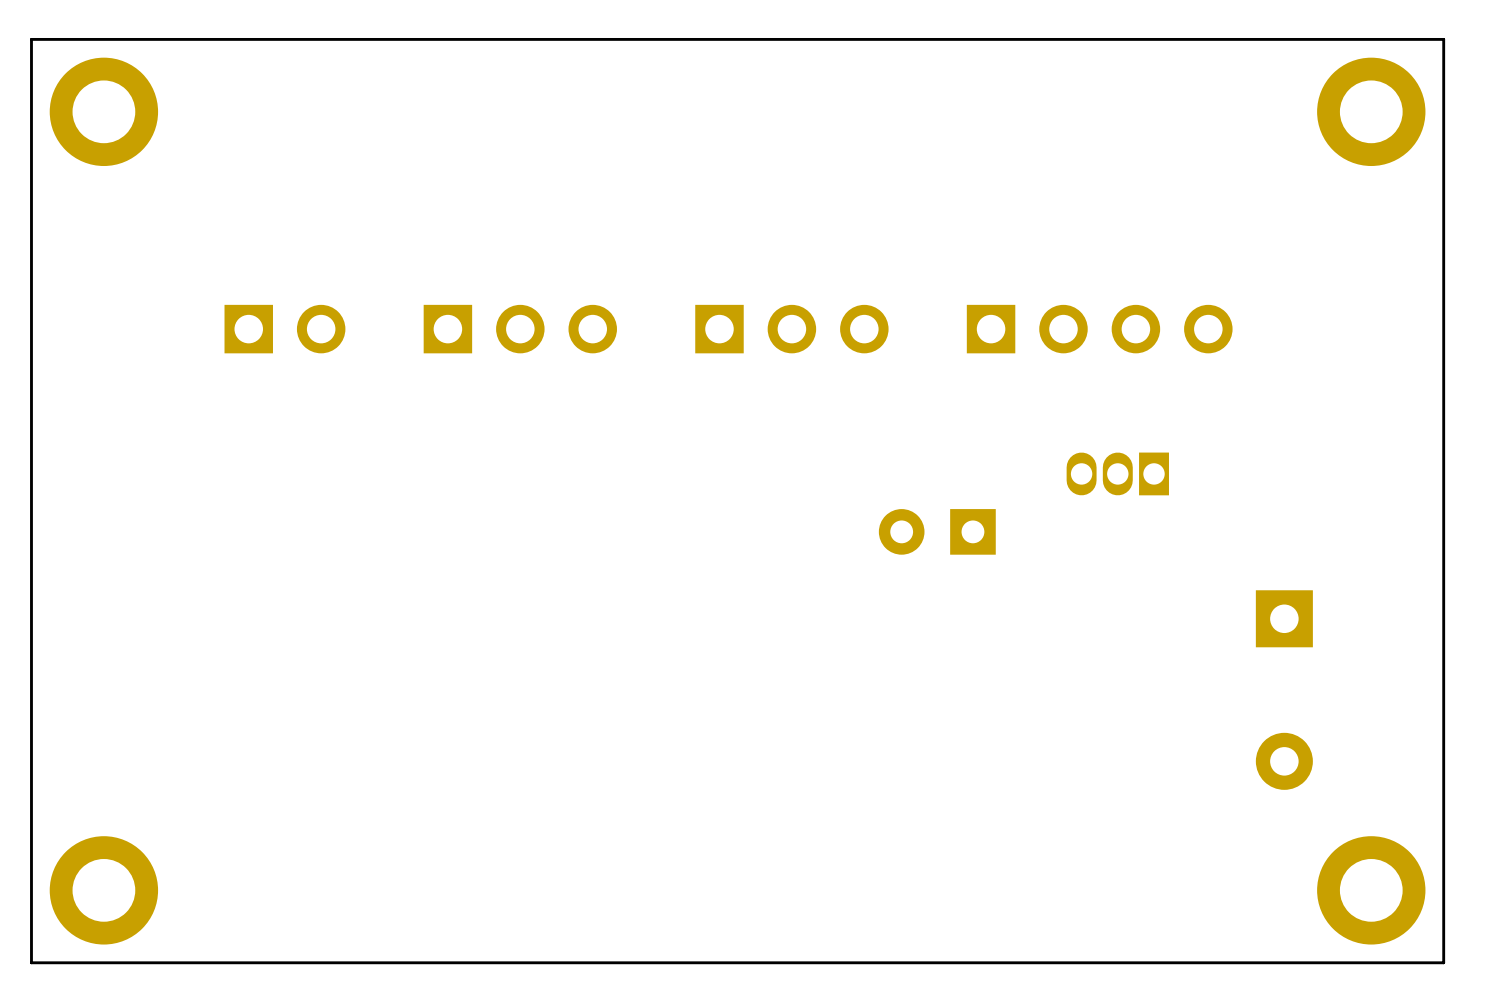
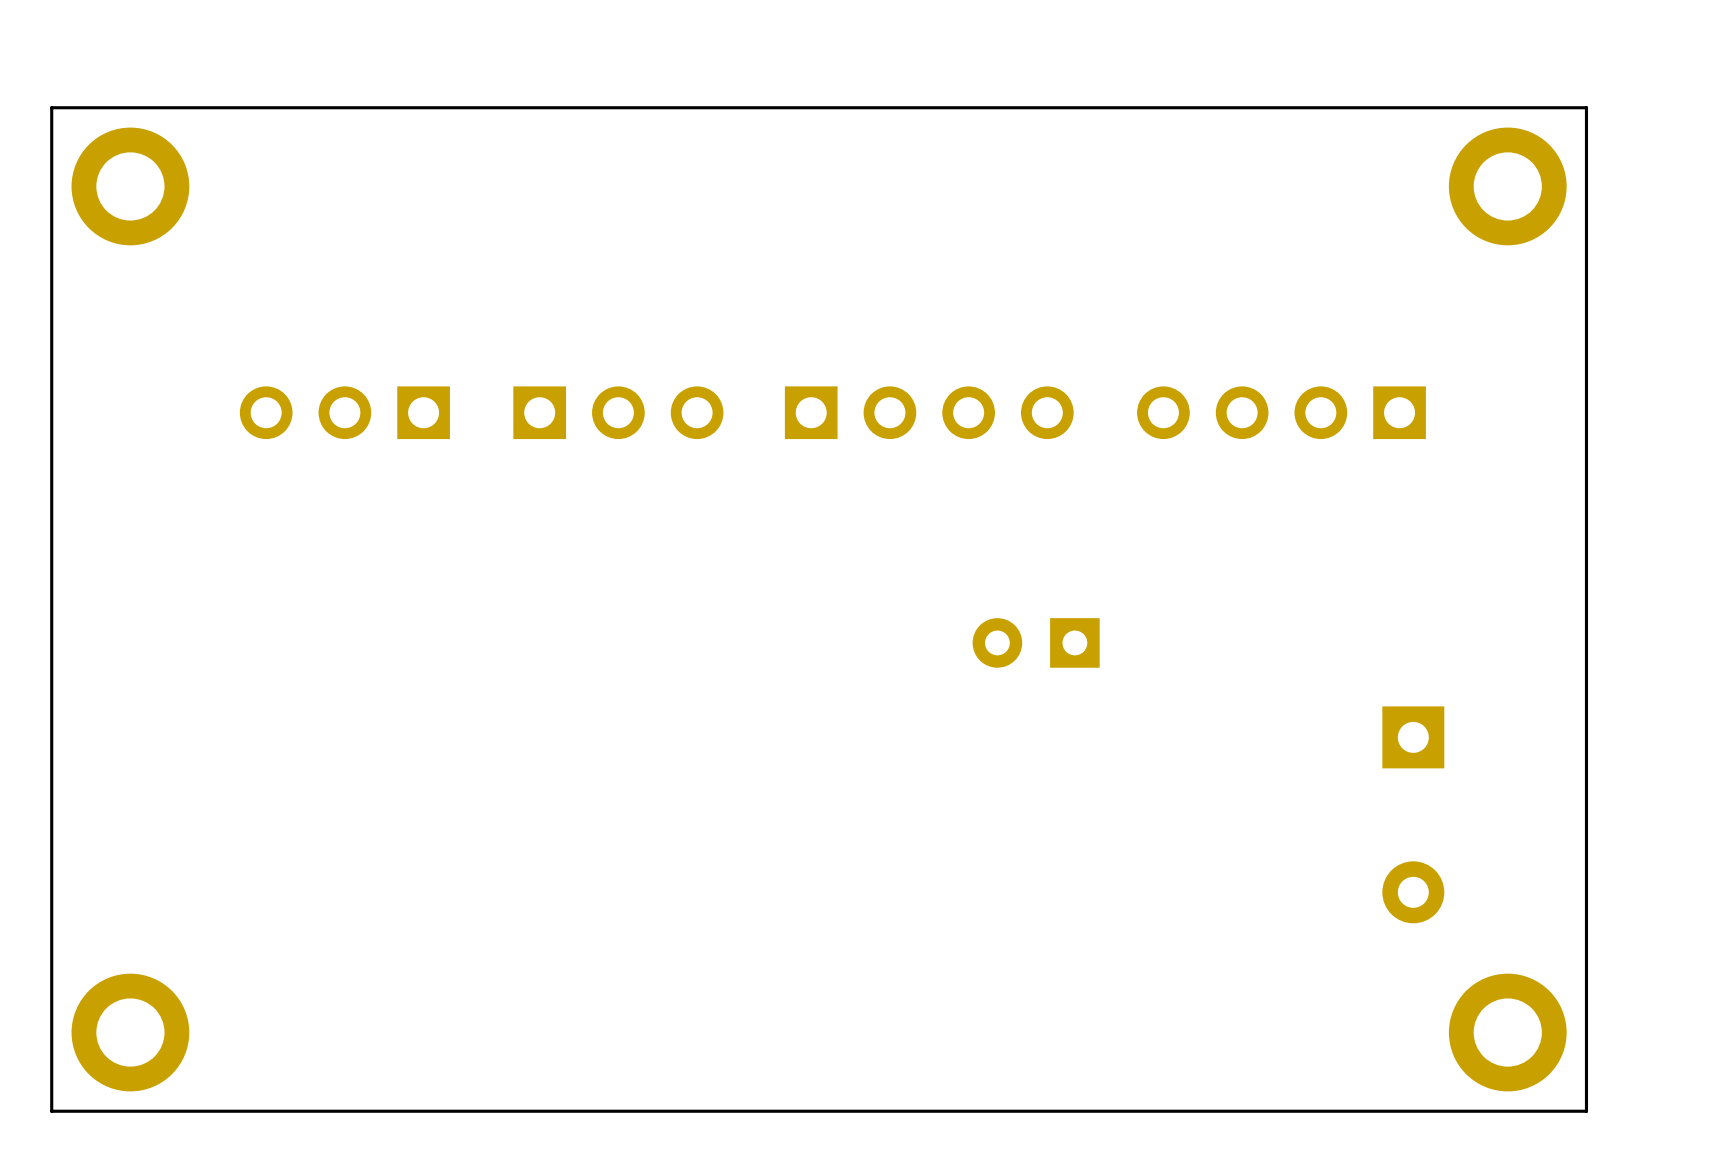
part footprint: [224, 304, 346, 354] -> [239, 386, 450, 440]
part: none -> (929, 412)
part position: (520, 329) -> (618, 412)
part: (791, 329) -> none
part rotation: 0° (1099, 329) -> 180° (1281, 412)
part: (1117, 473) -> none

